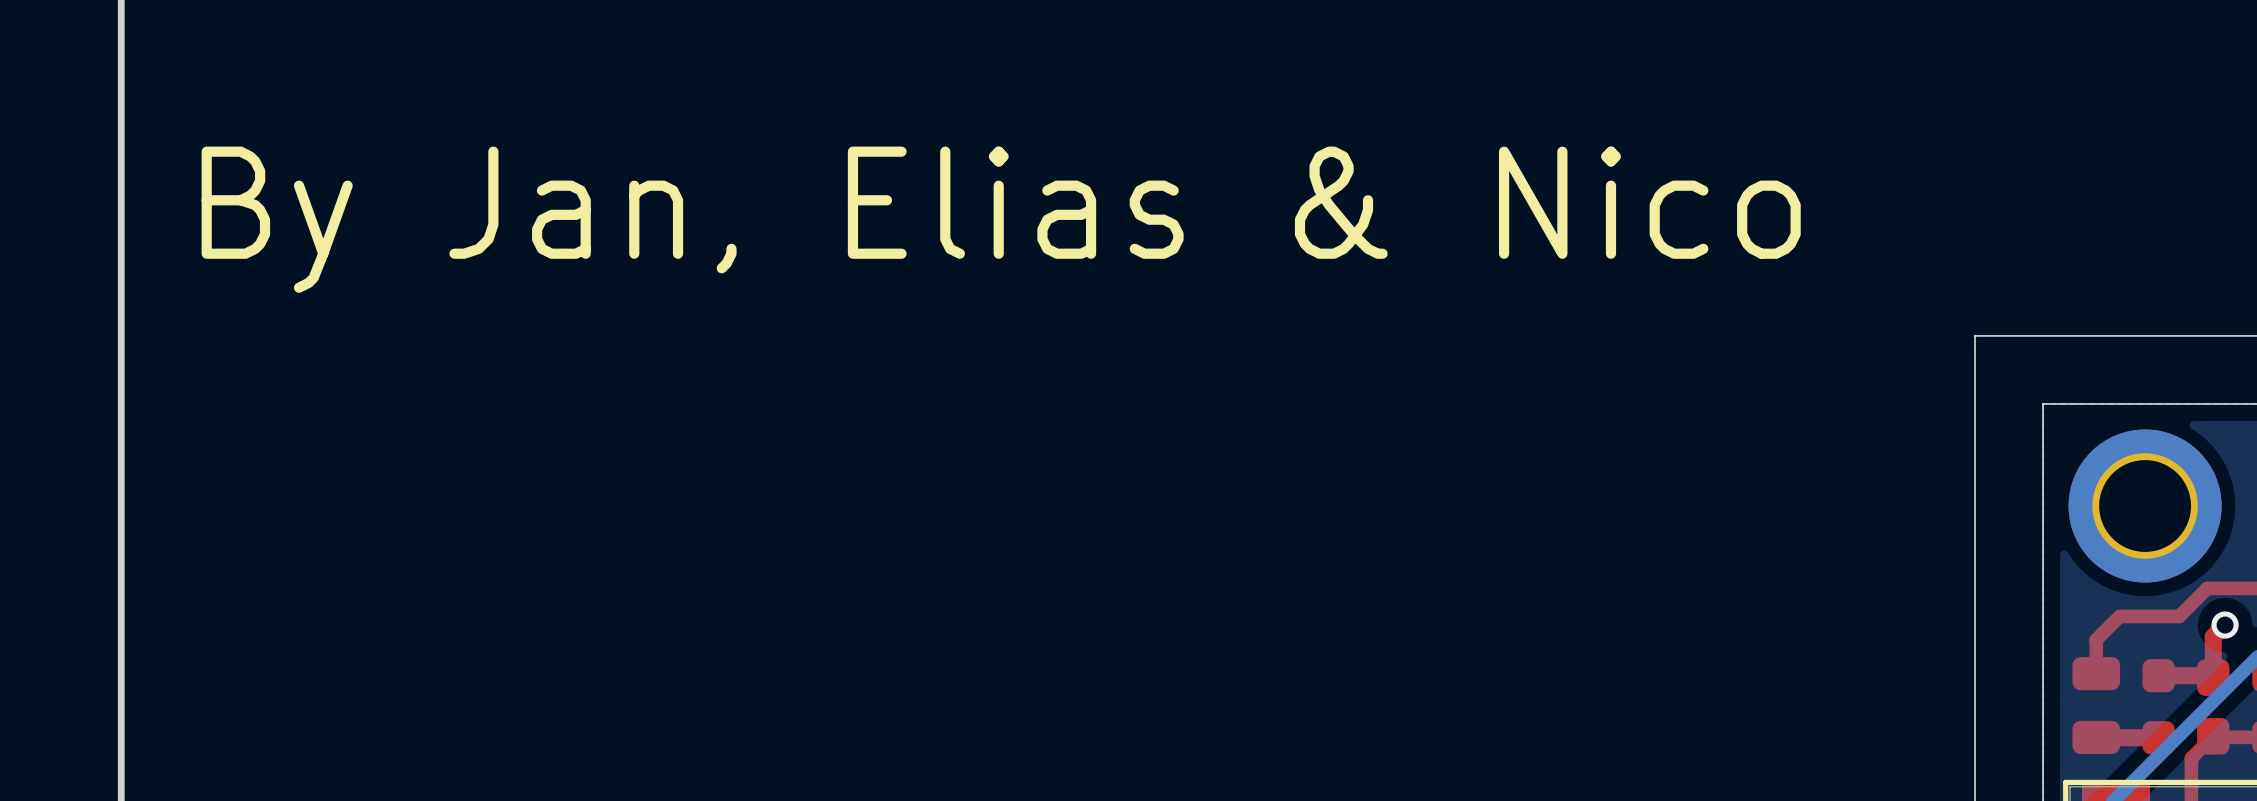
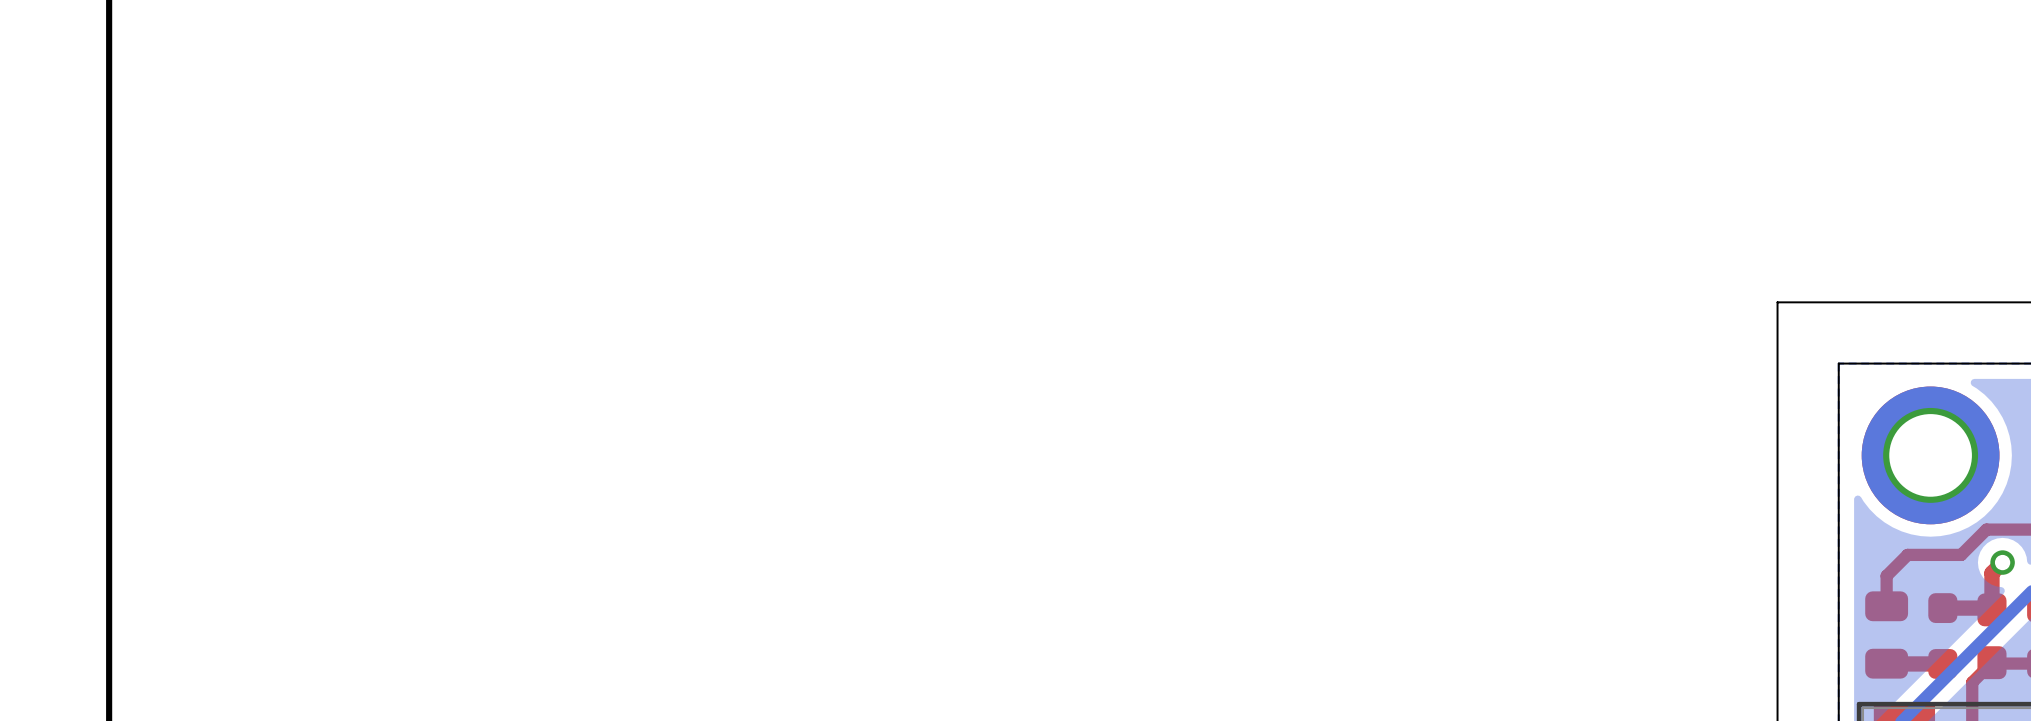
text: By Jan, Elias & Nico (1001, 219) -> none

